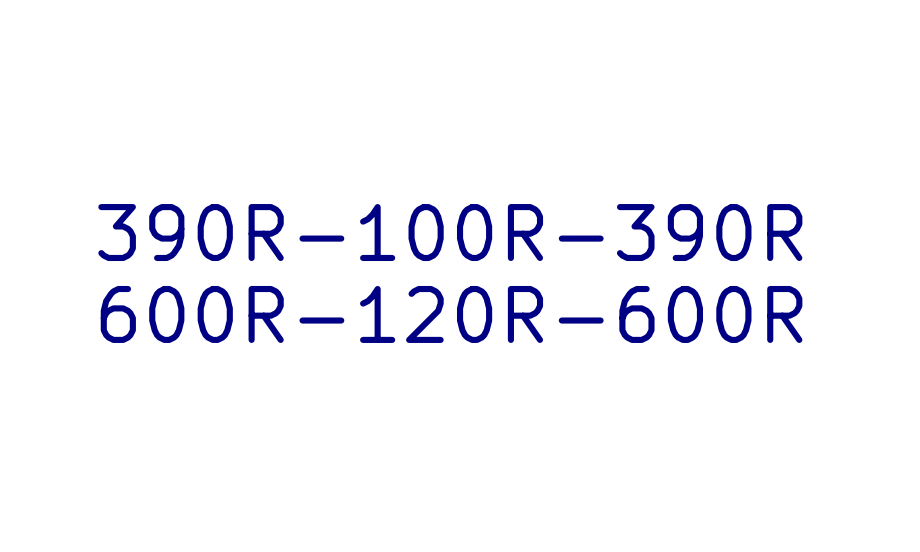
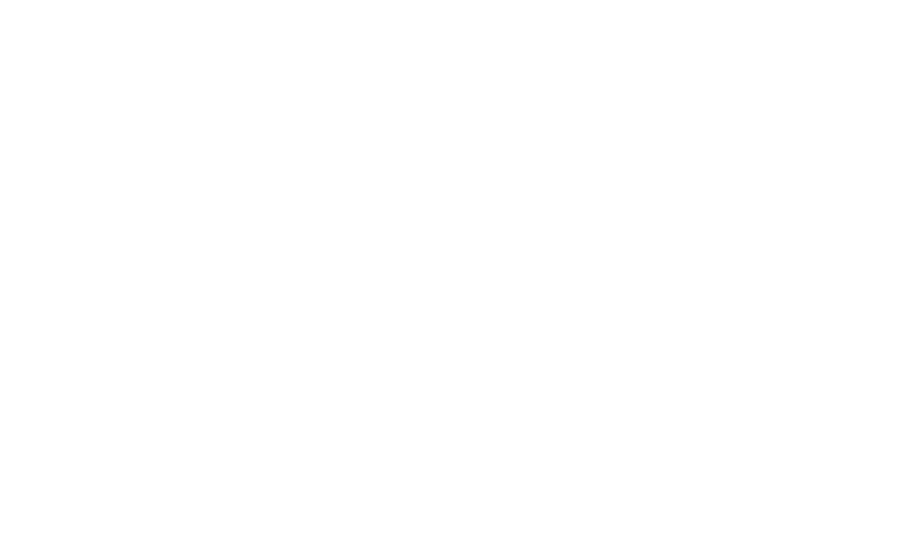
text: 390R-100R-390R (450, 232) -> none
text: 600R-120R-600R (451, 314) -> none

